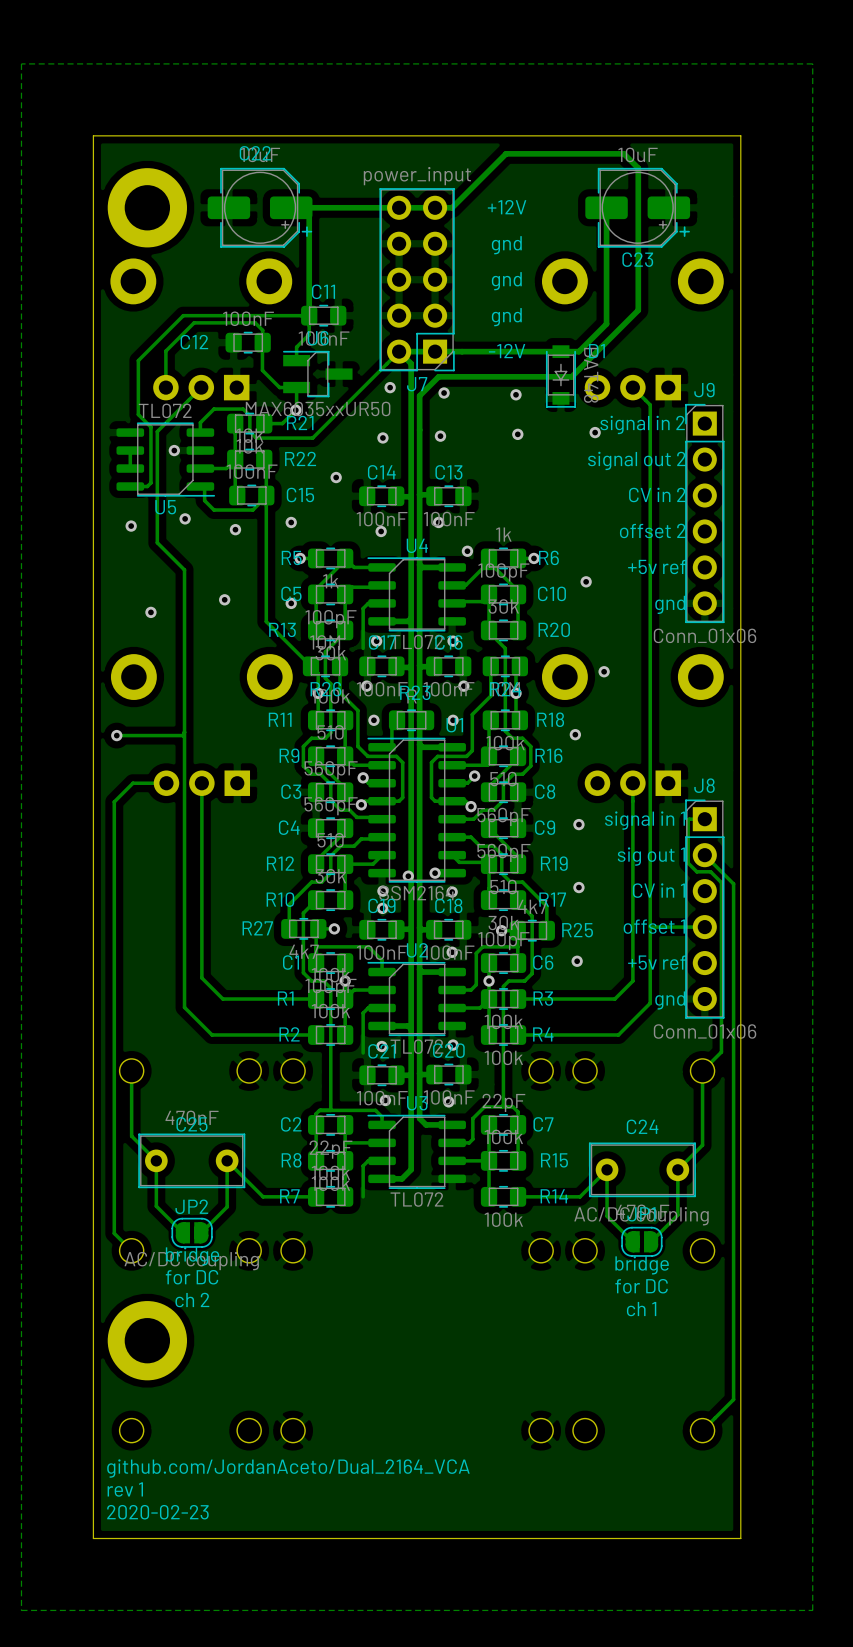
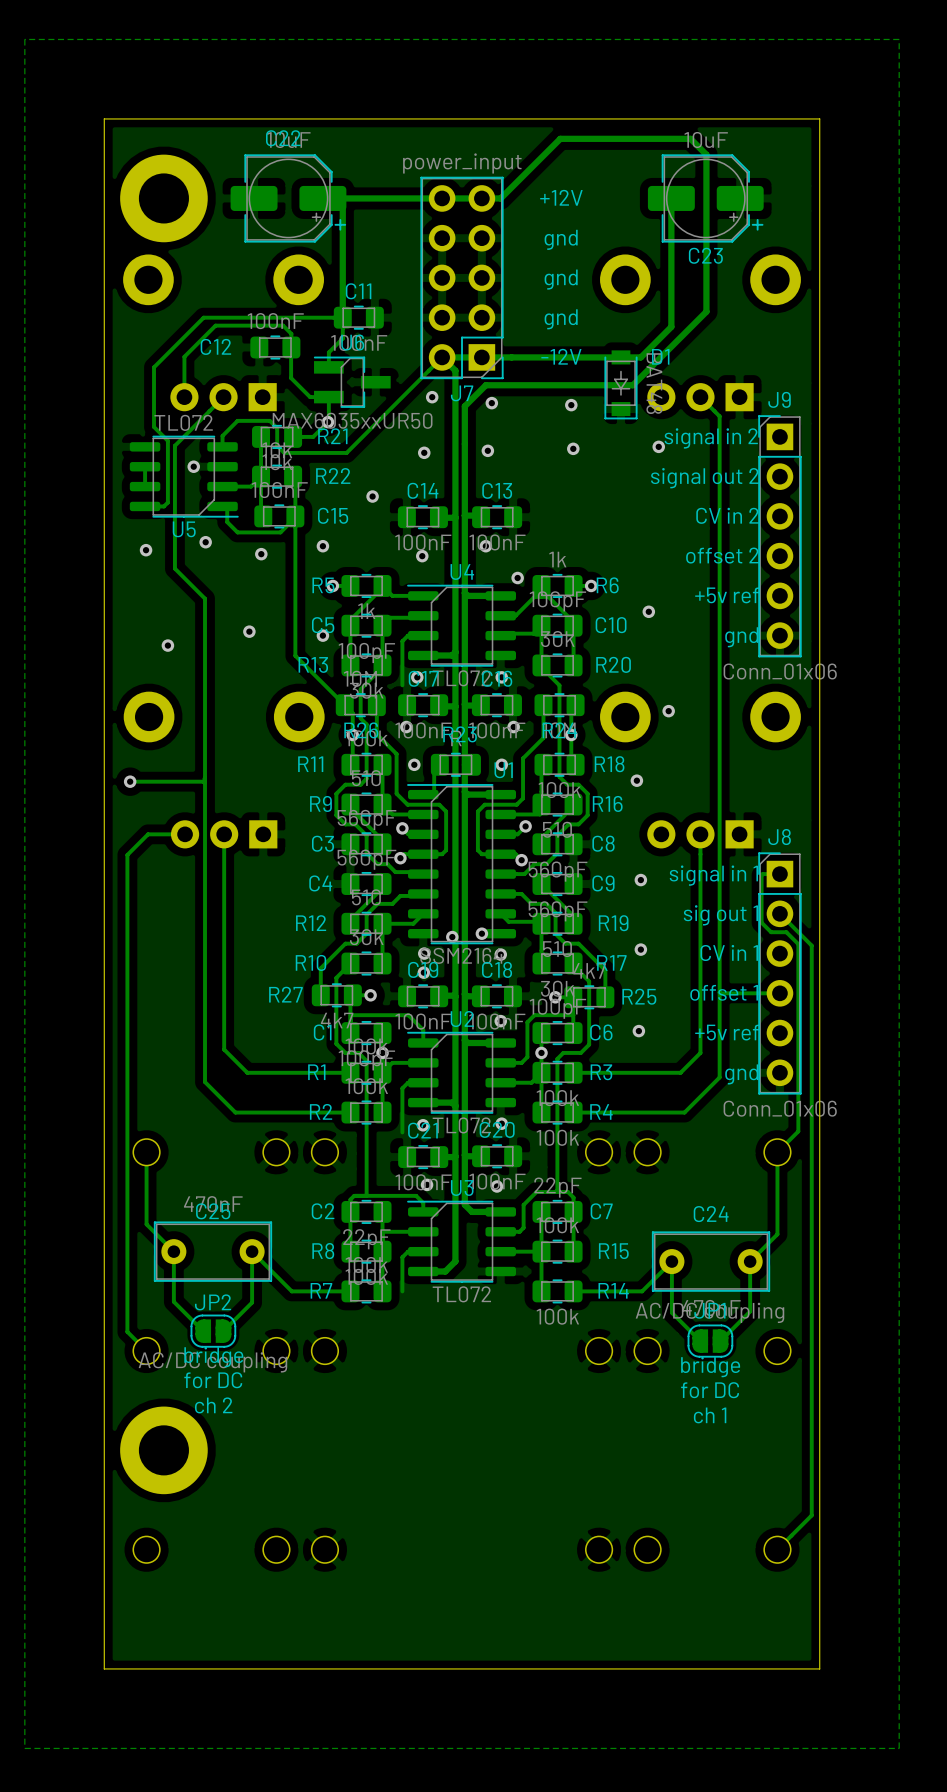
text: github.com/JordanAceto/Dual_2164_VCA (288, 1468) -> none
text: rev 1 (125, 1489) -> none
text: 2020-02-23 (157, 1512) -> none

